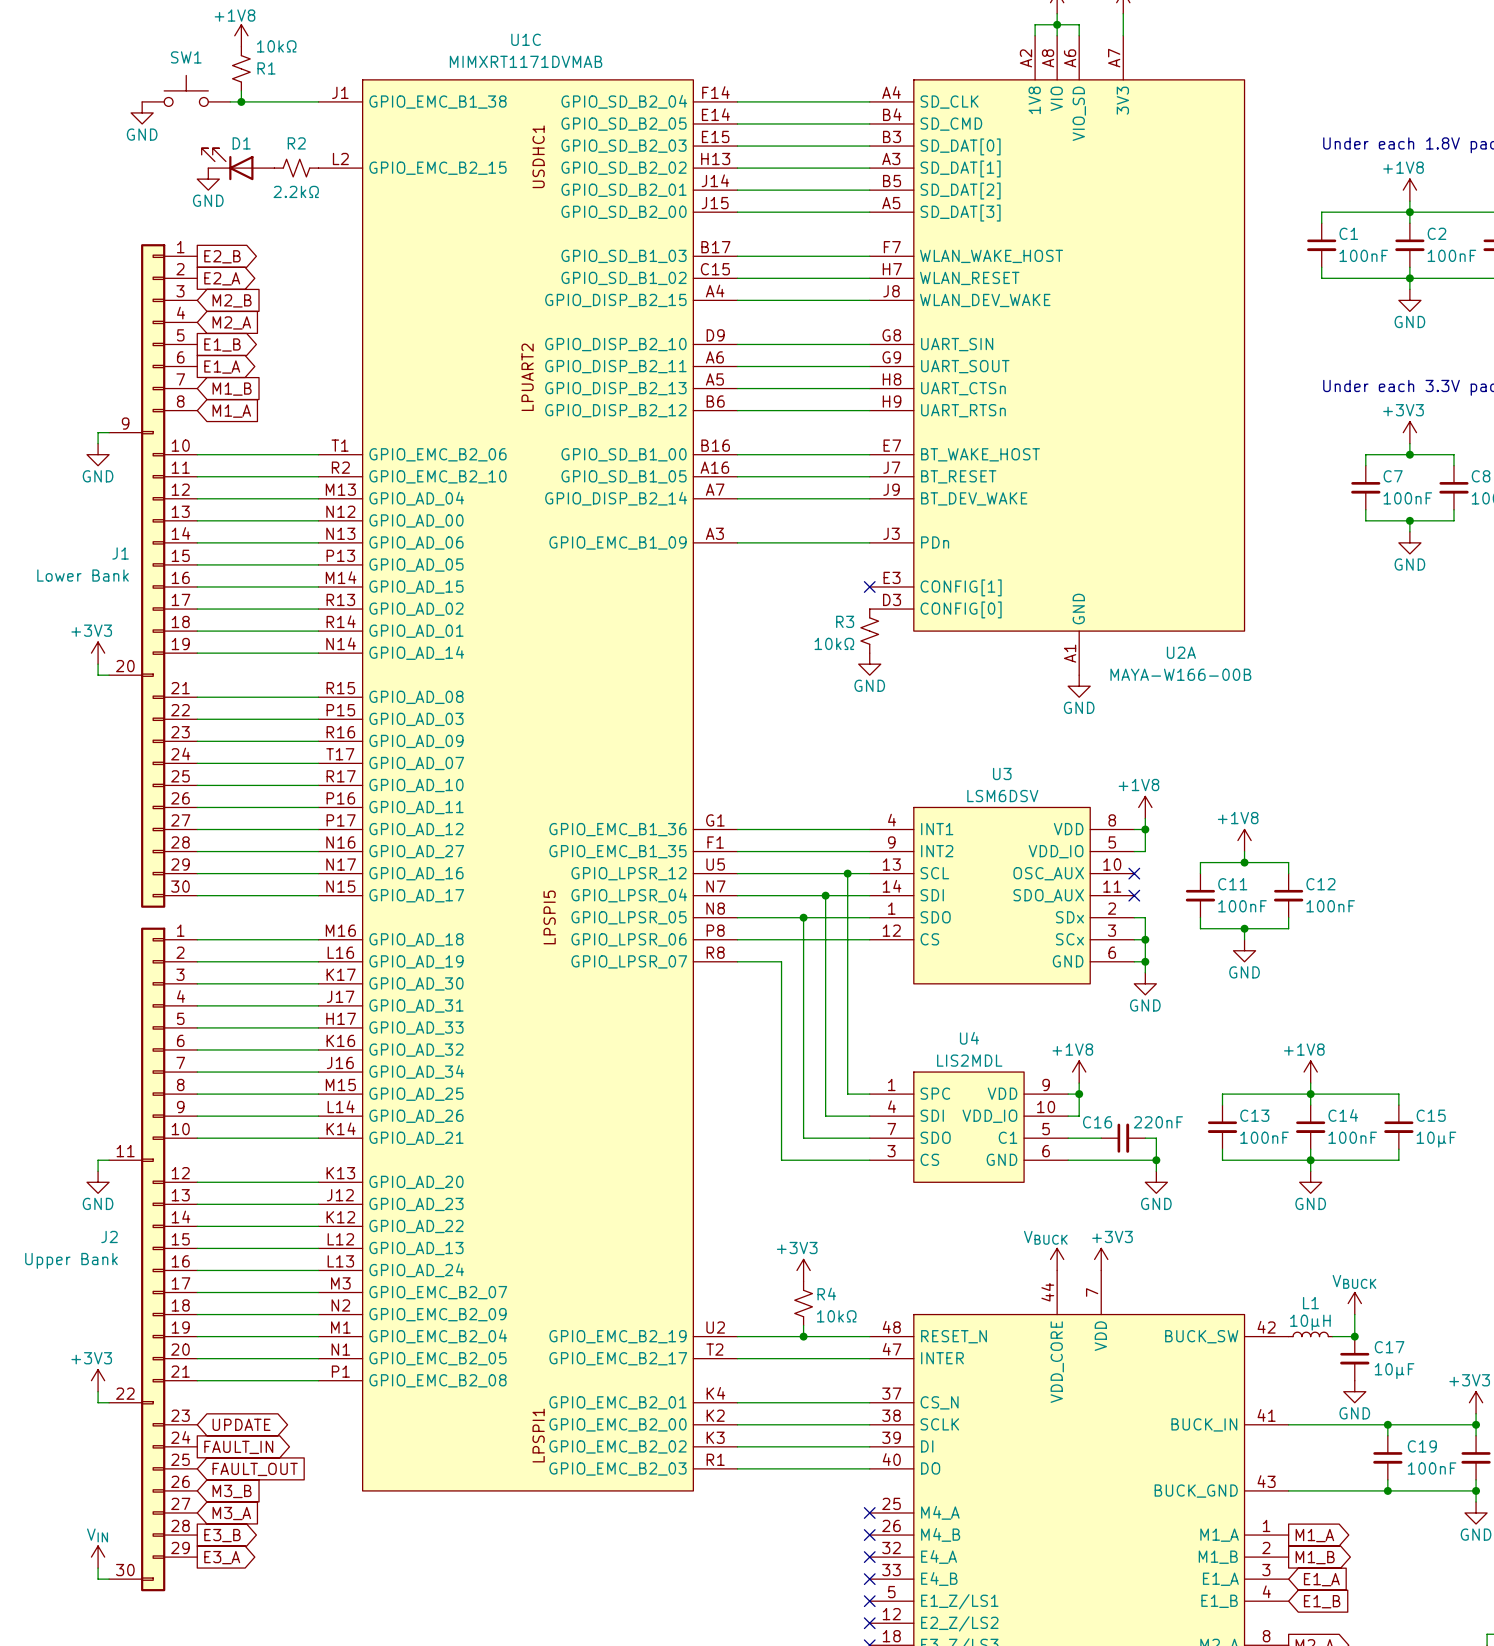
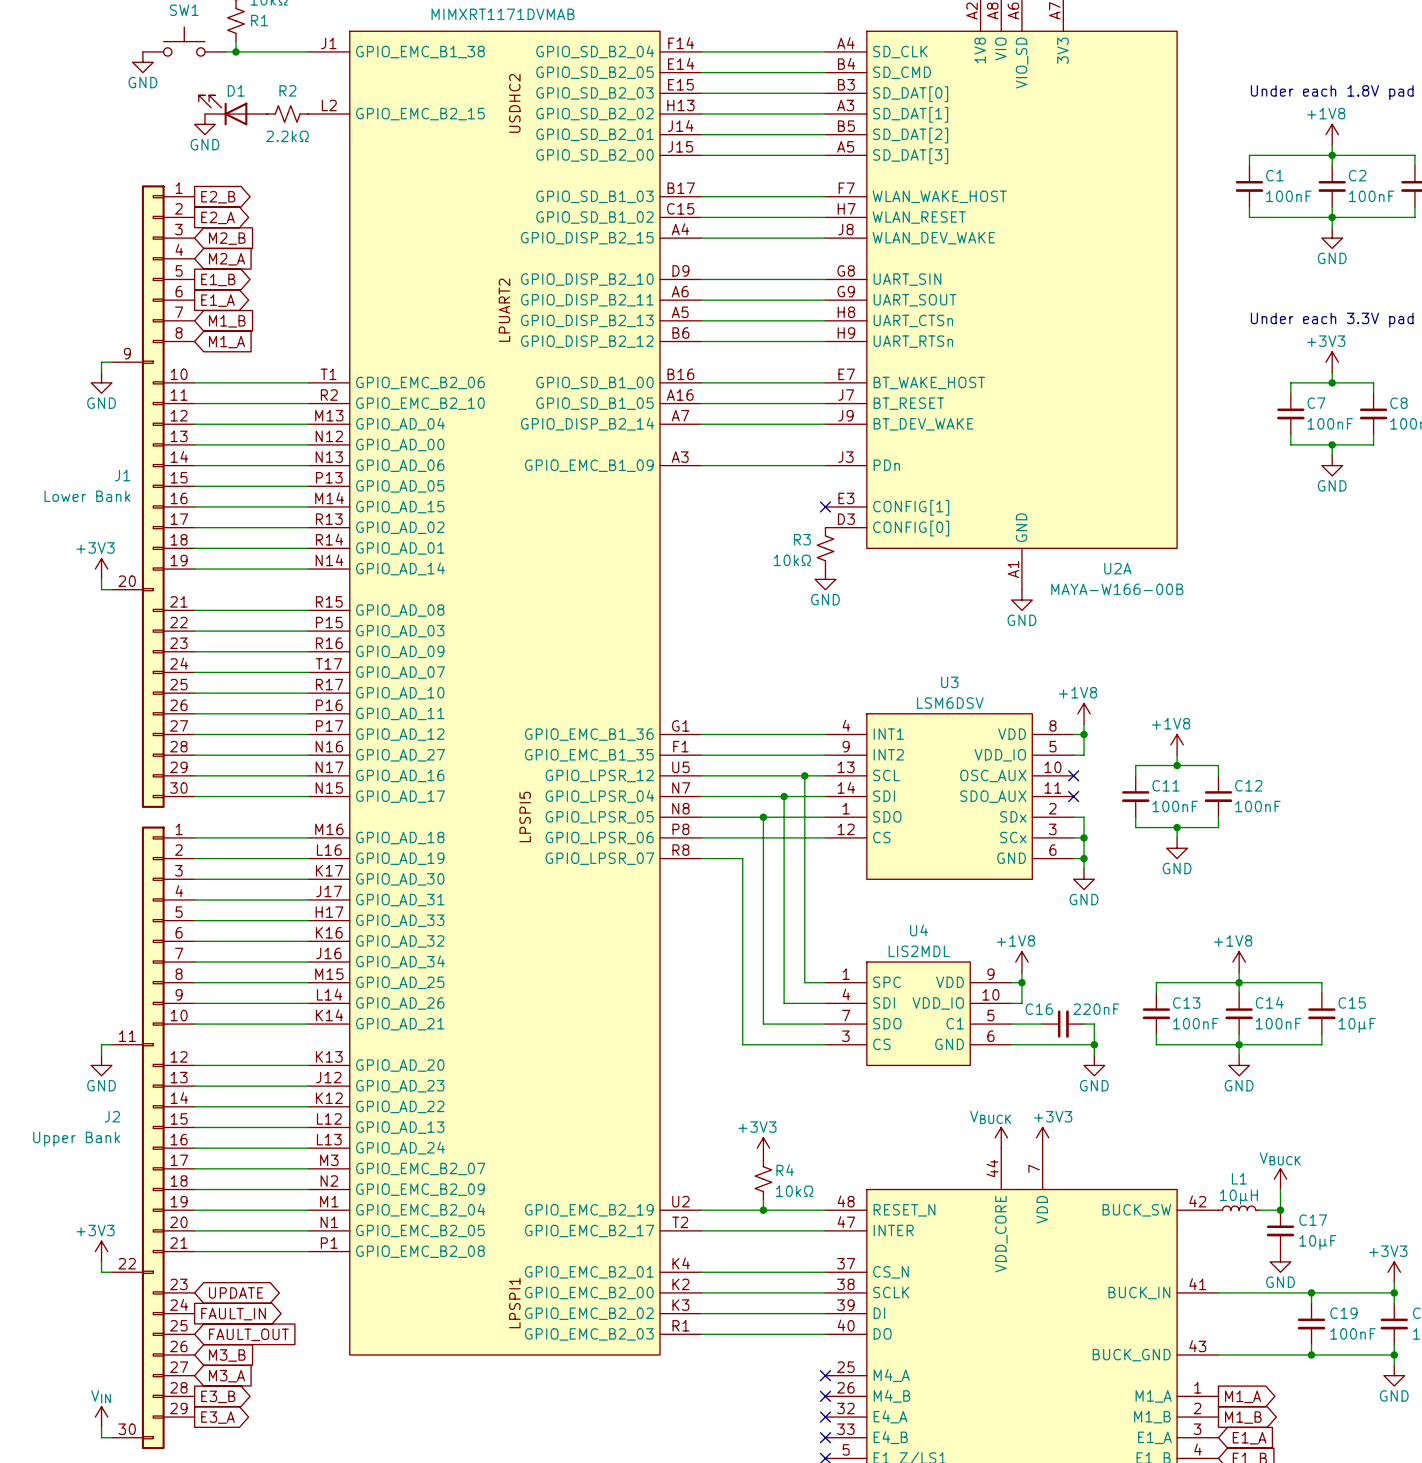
U1C text: USDHC1 (538, 156) -> USDHC2 (514, 103)

